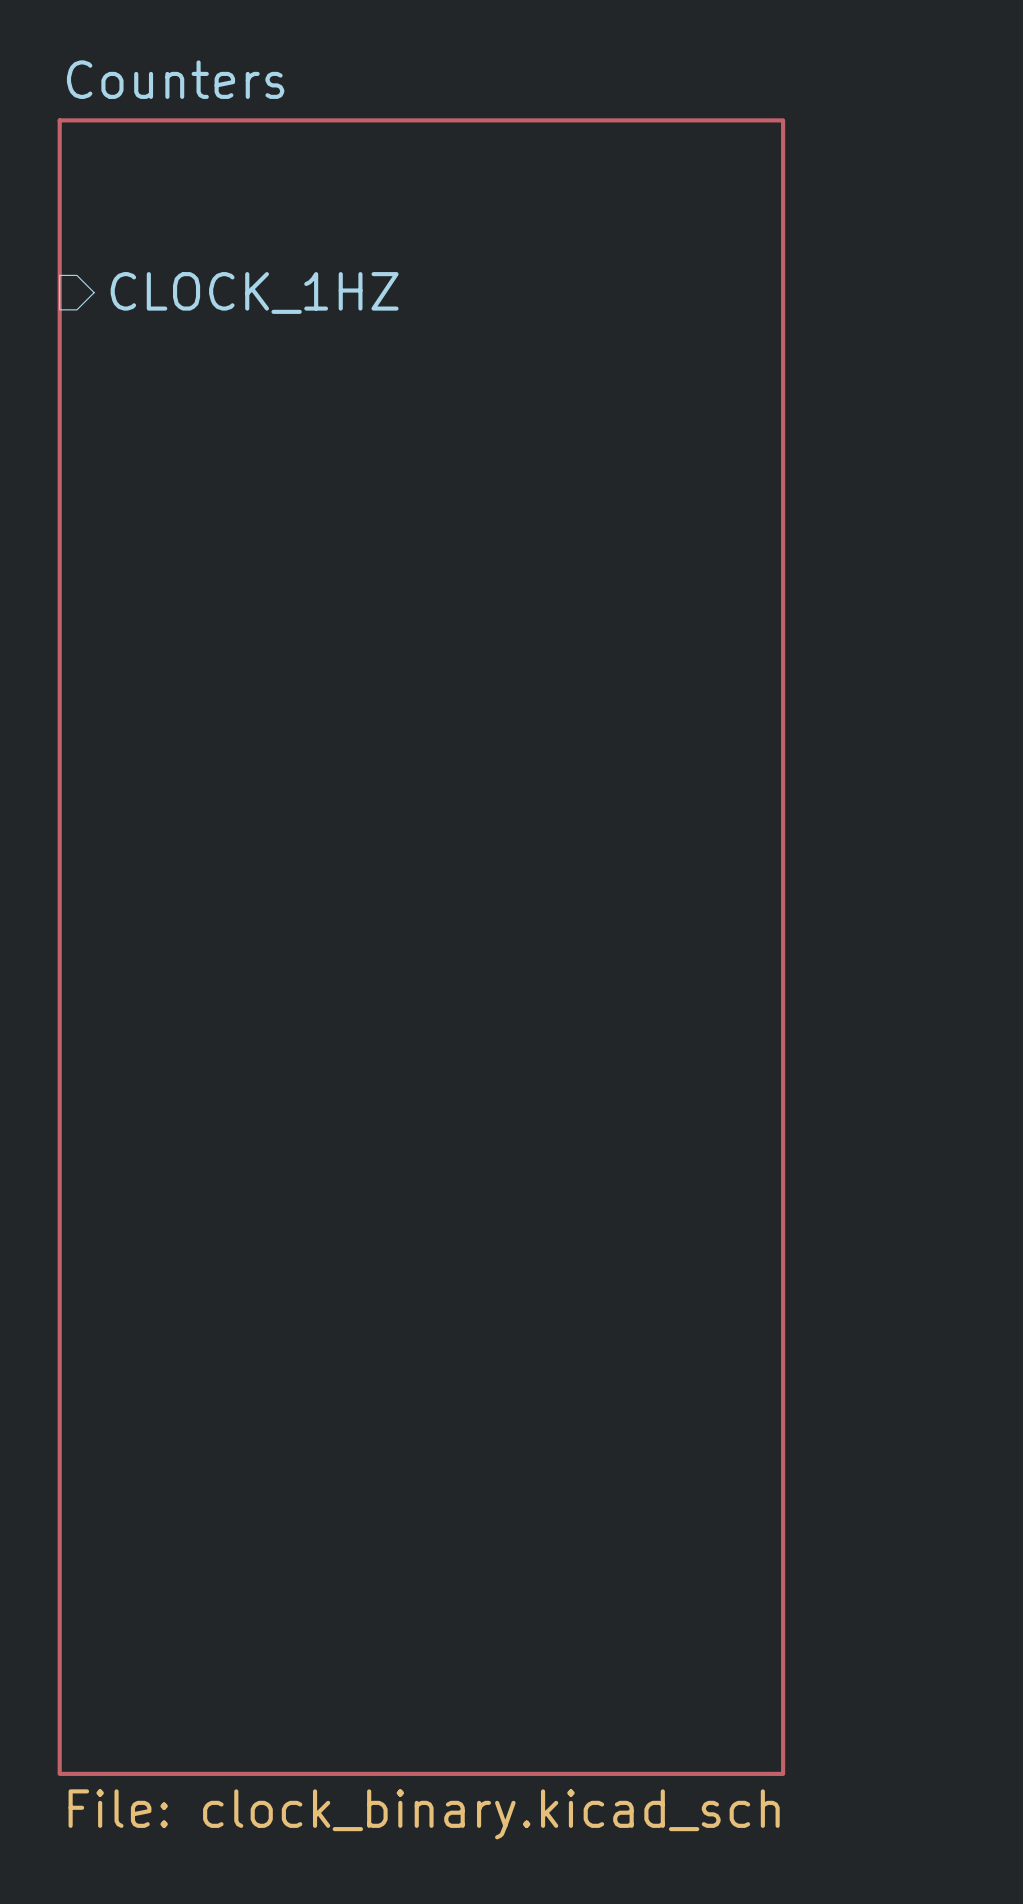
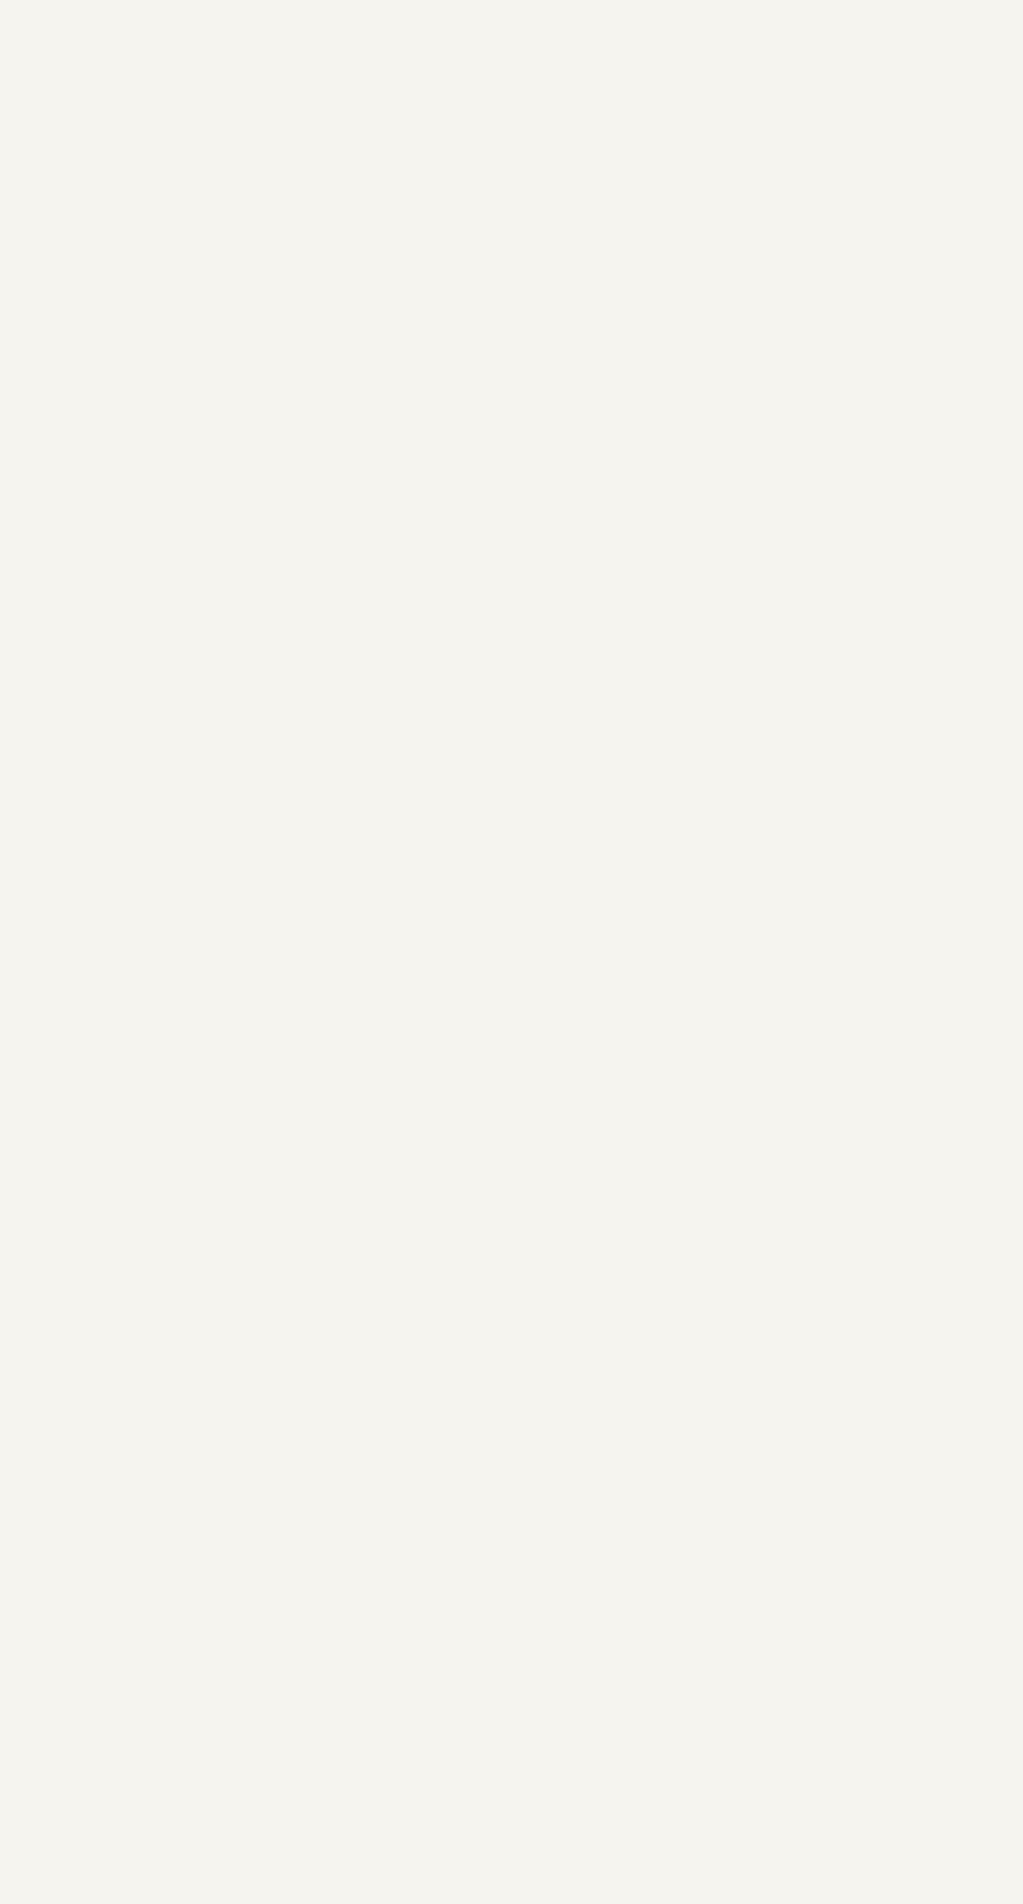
sheet pin: CLOCK_1HZ (254, 292) -> none
sheet Counters: File: clock_binary.kicad_sch (421, 947) -> none

